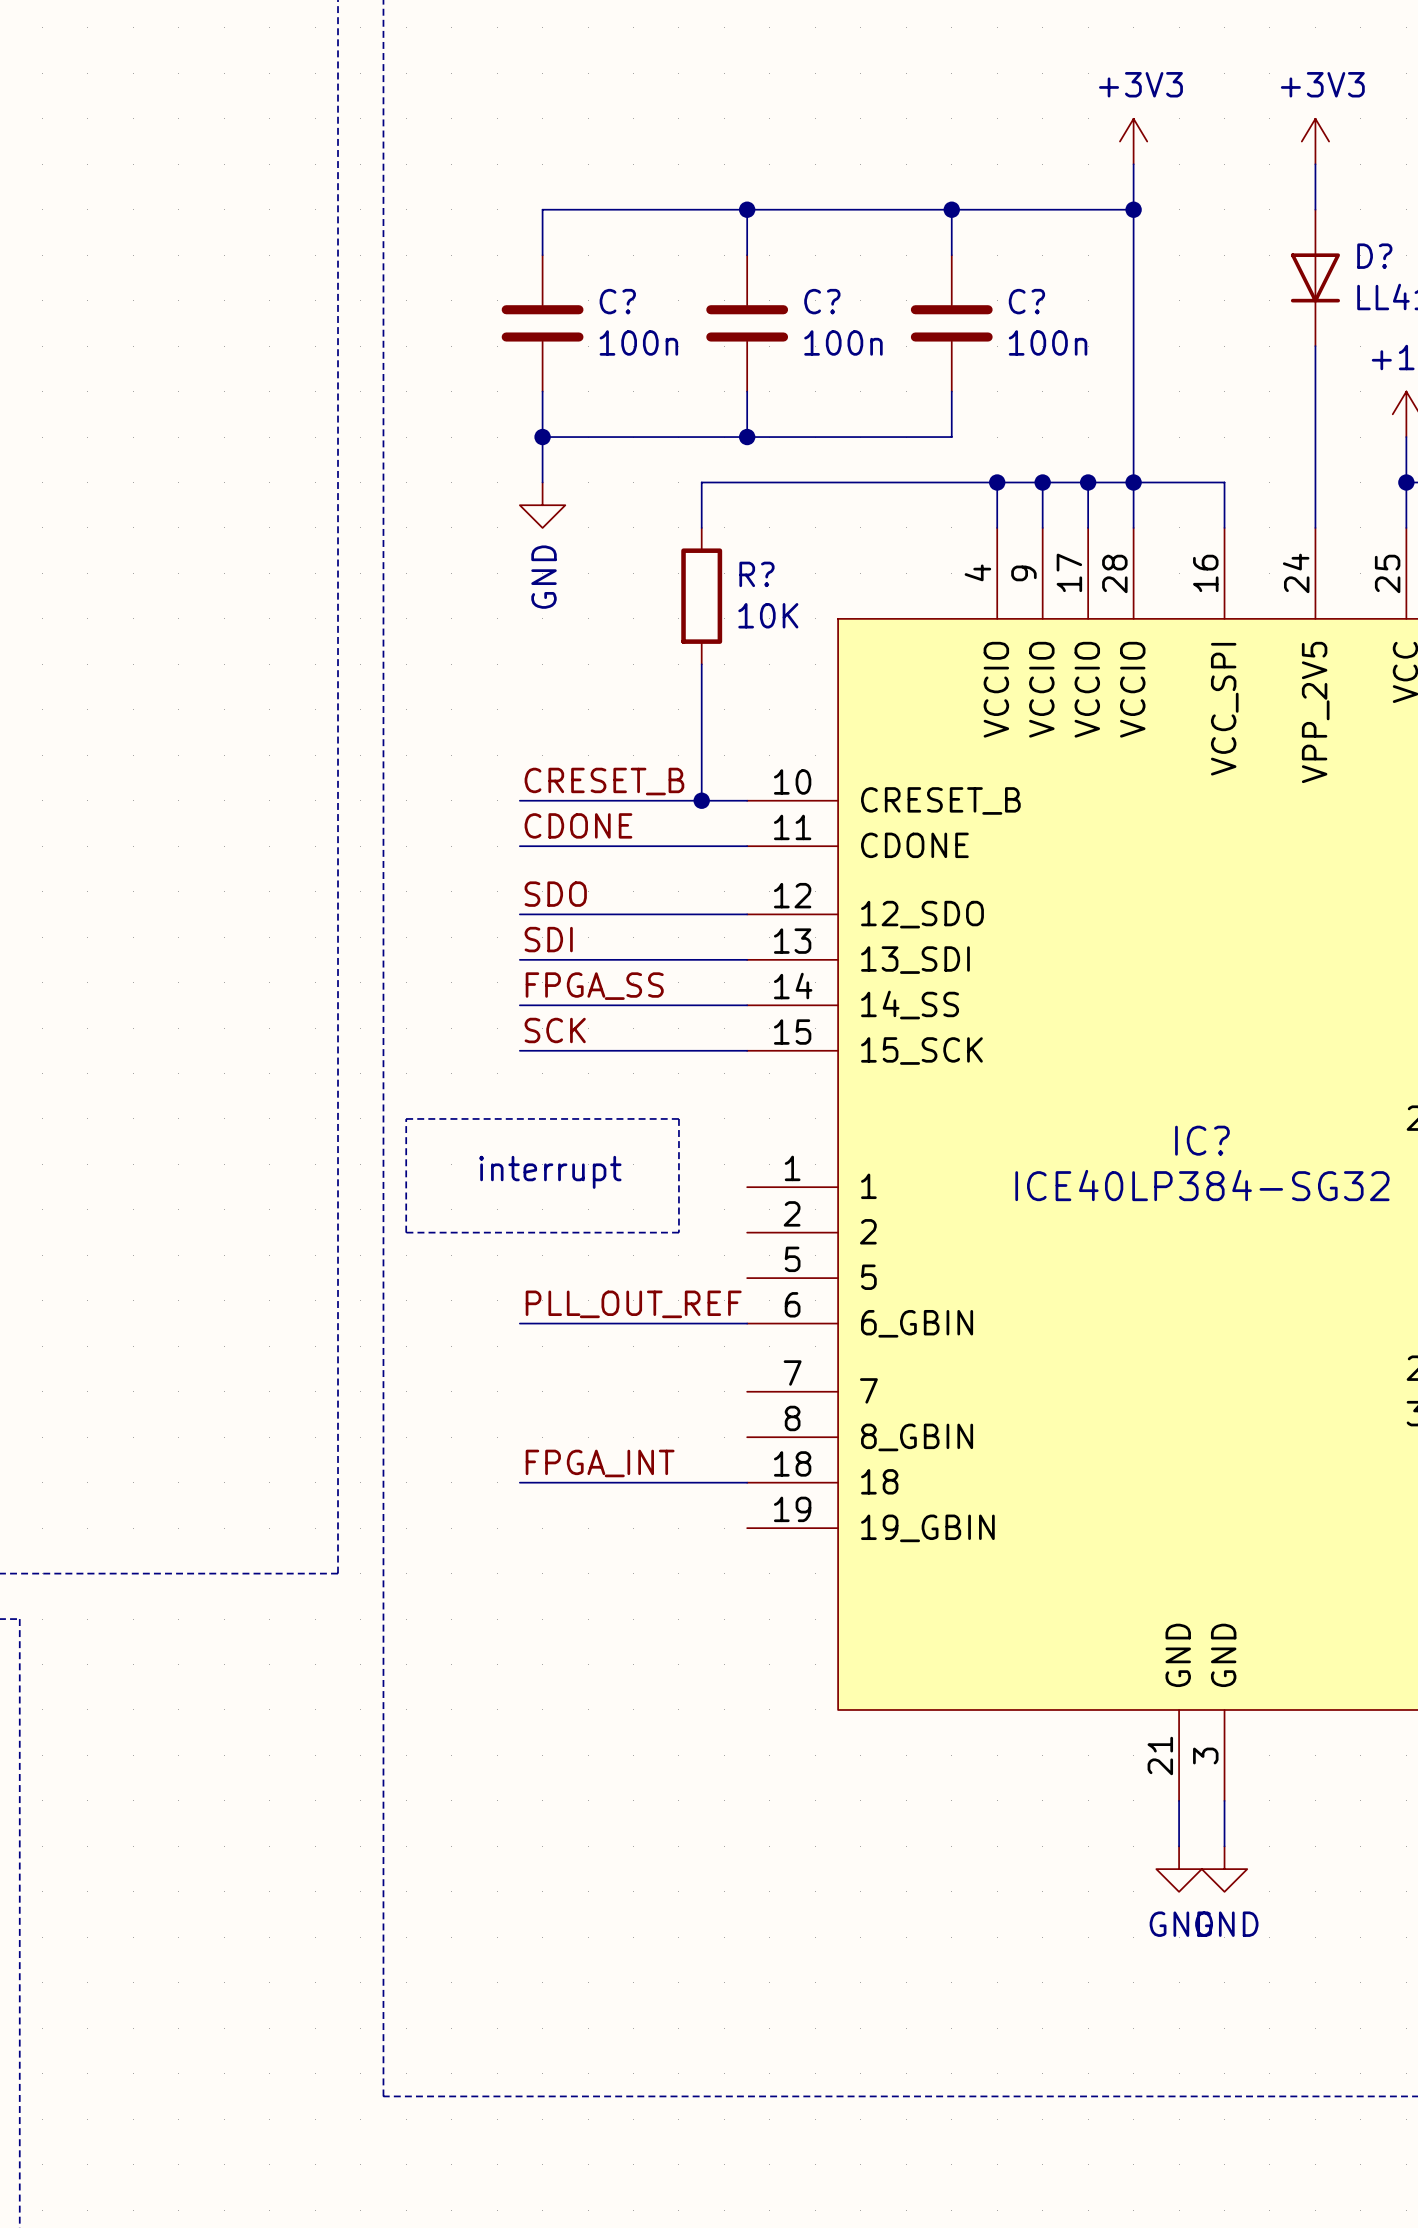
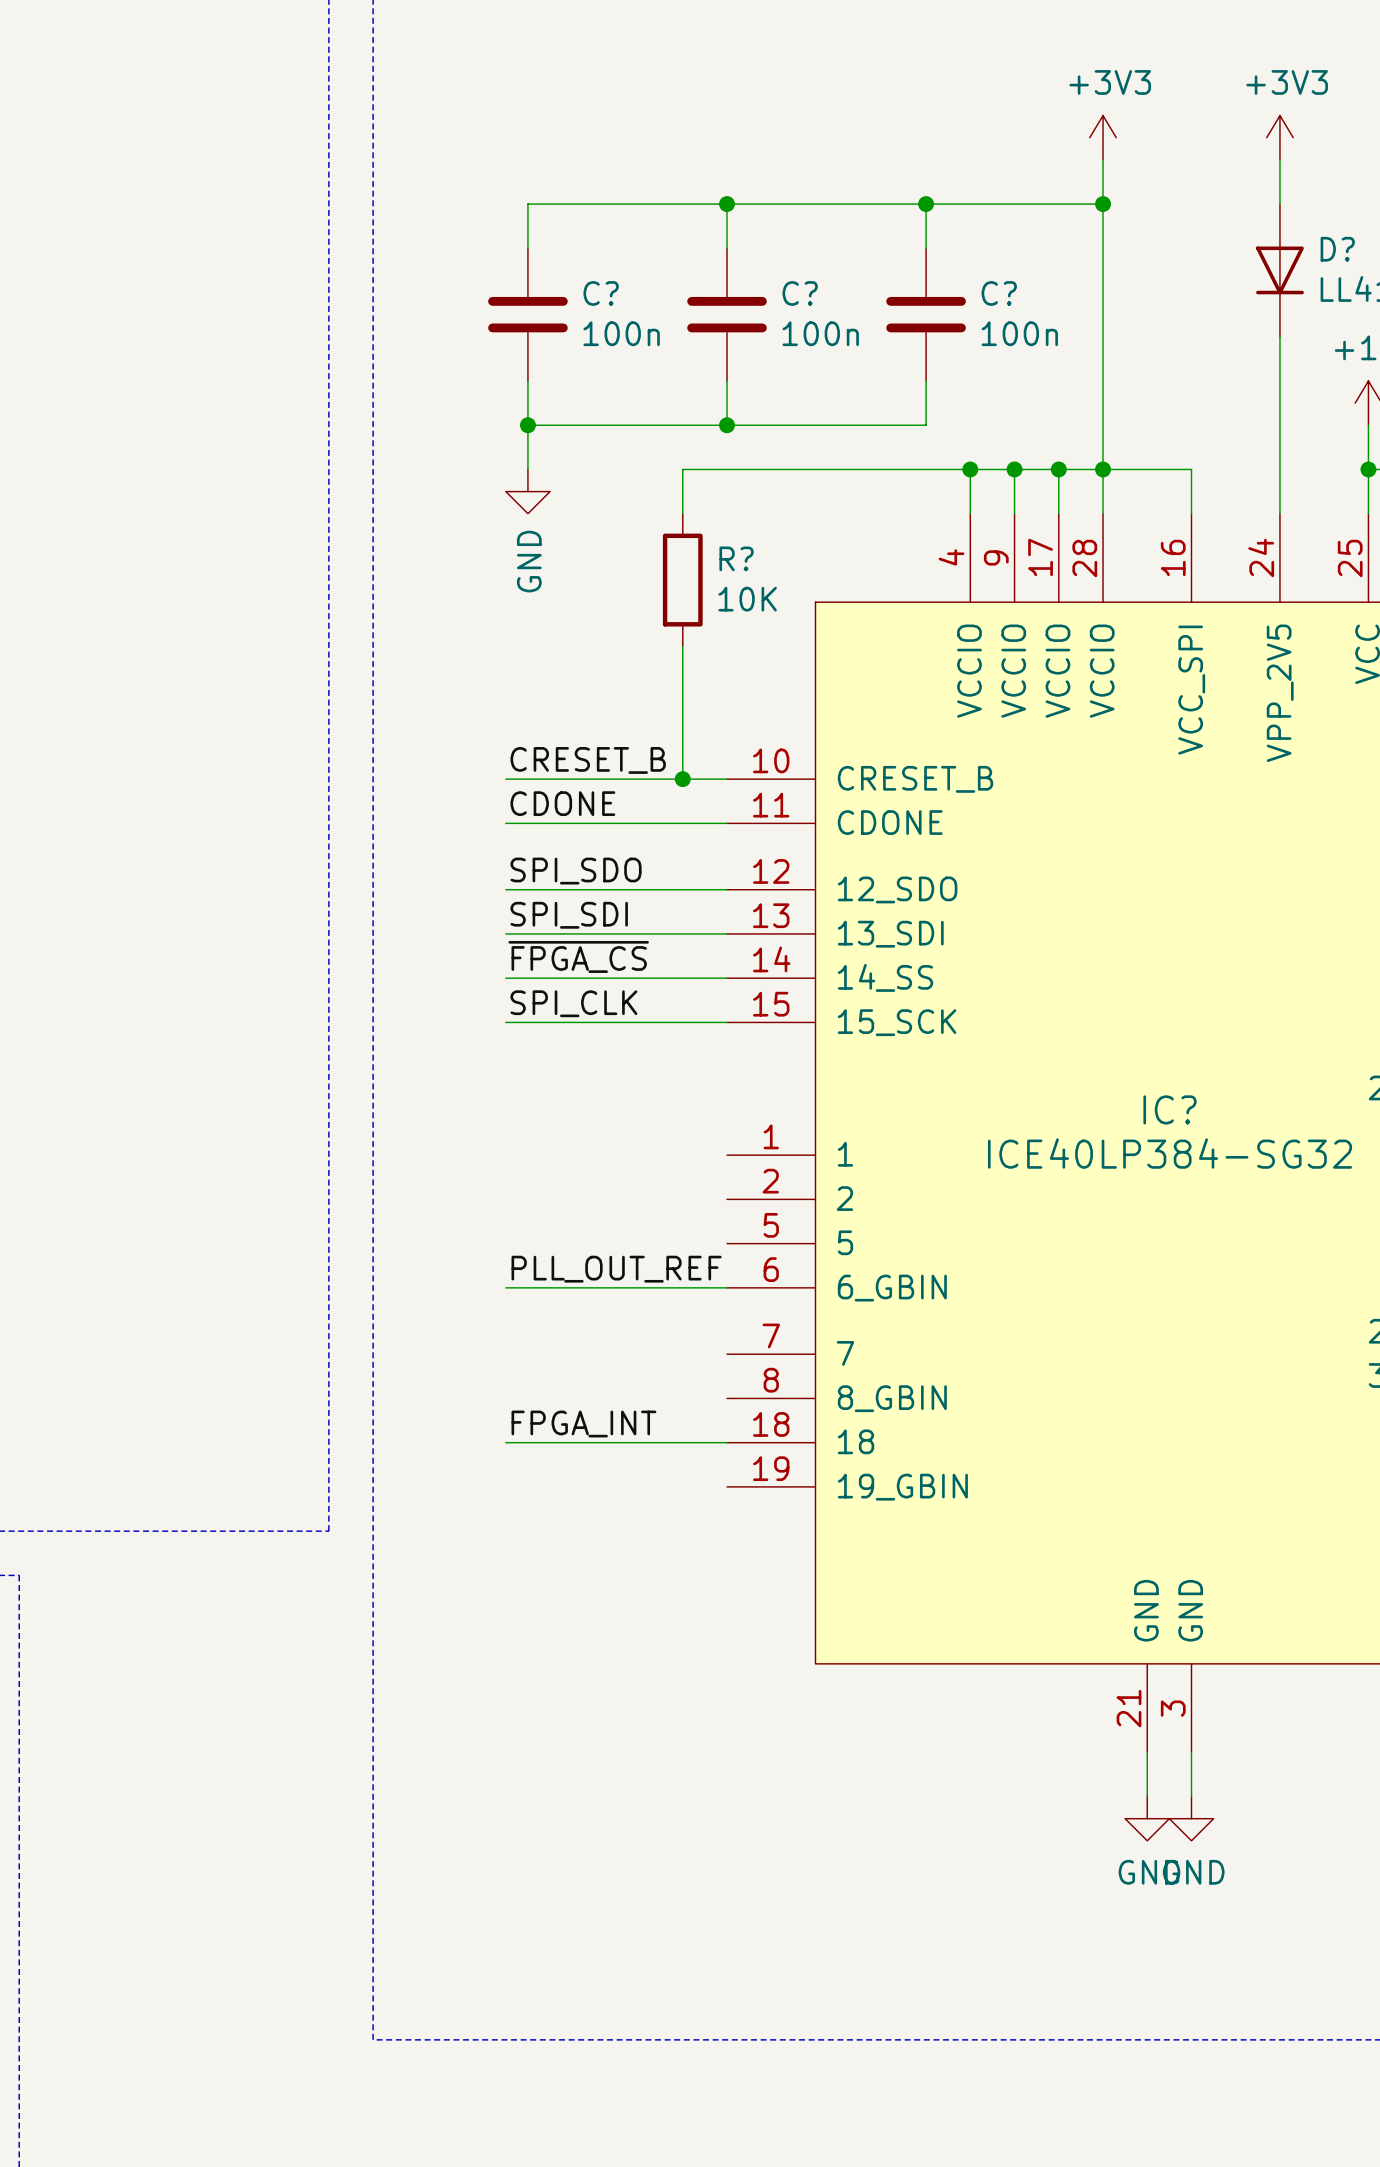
label: SDO (555, 894) -> SPI_SDO (576, 871)
label: SDI (548, 939) -> SPI_SDI (569, 915)
label: FPGA_SS (594, 986) -> ~{FPGA_CS} (578, 956)
label: SCK (555, 1030) -> SPI_CLK (573, 1003)
line: (406, 1118) (406, 1232) (678, 1232) (678, 1118) (406, 1118) -> none
text: interrupt (550, 1172) -> none

